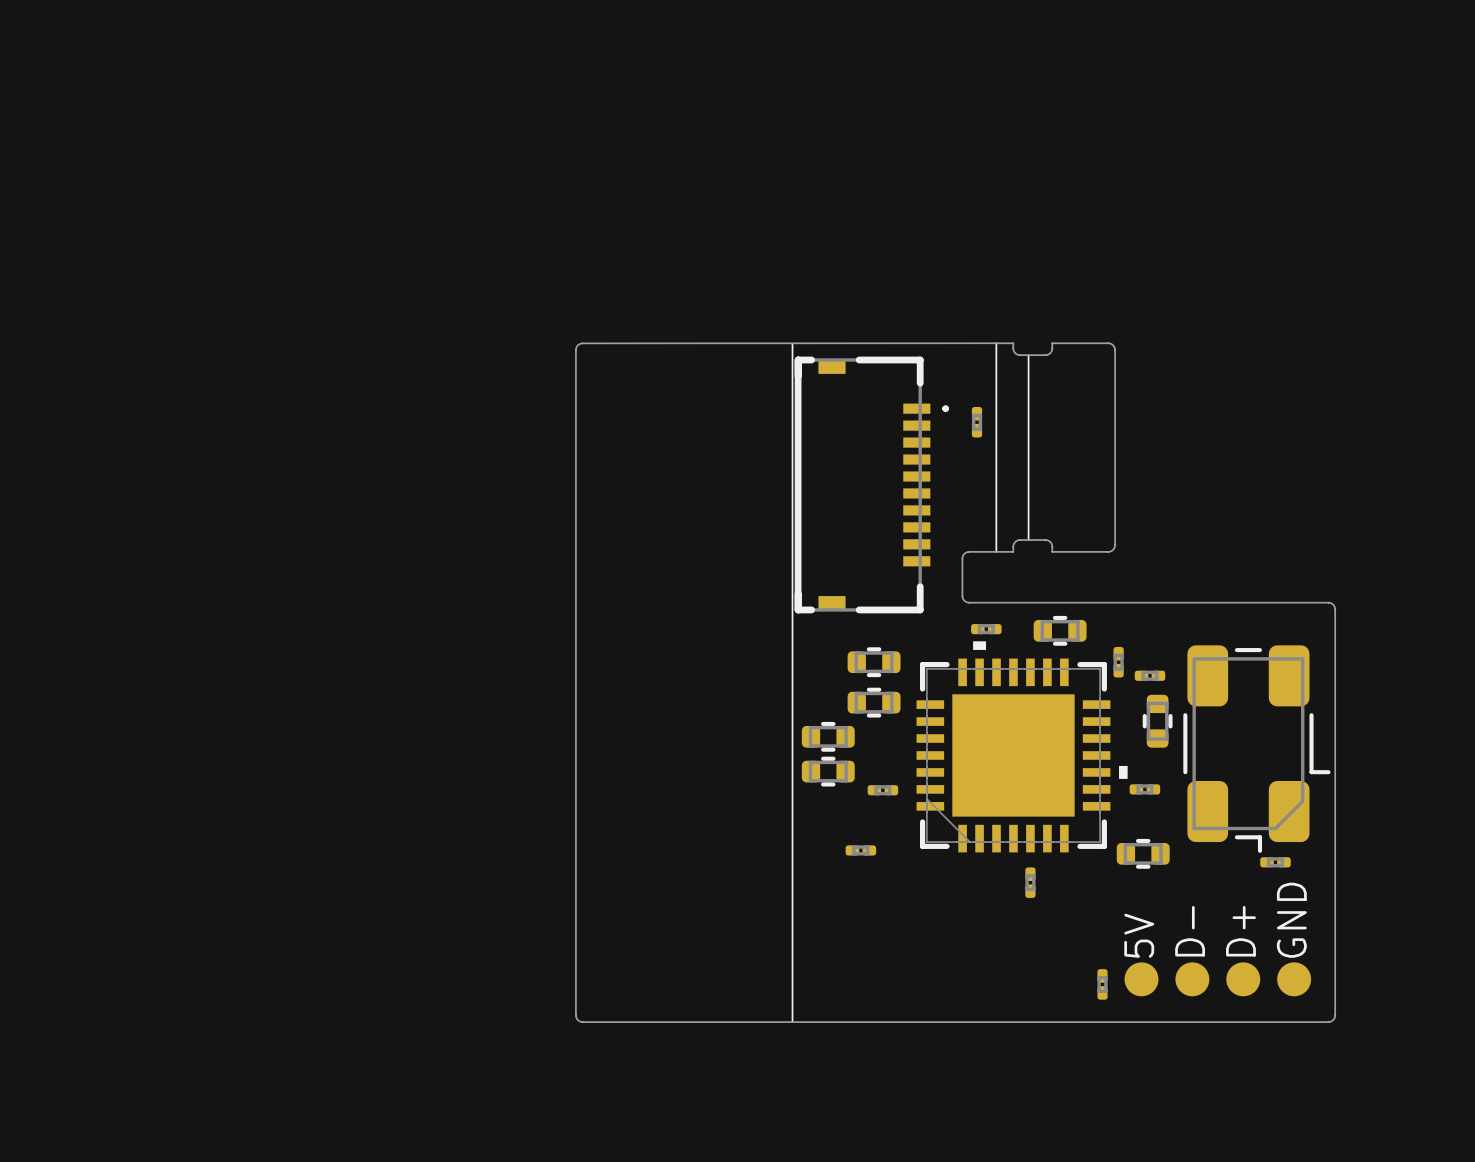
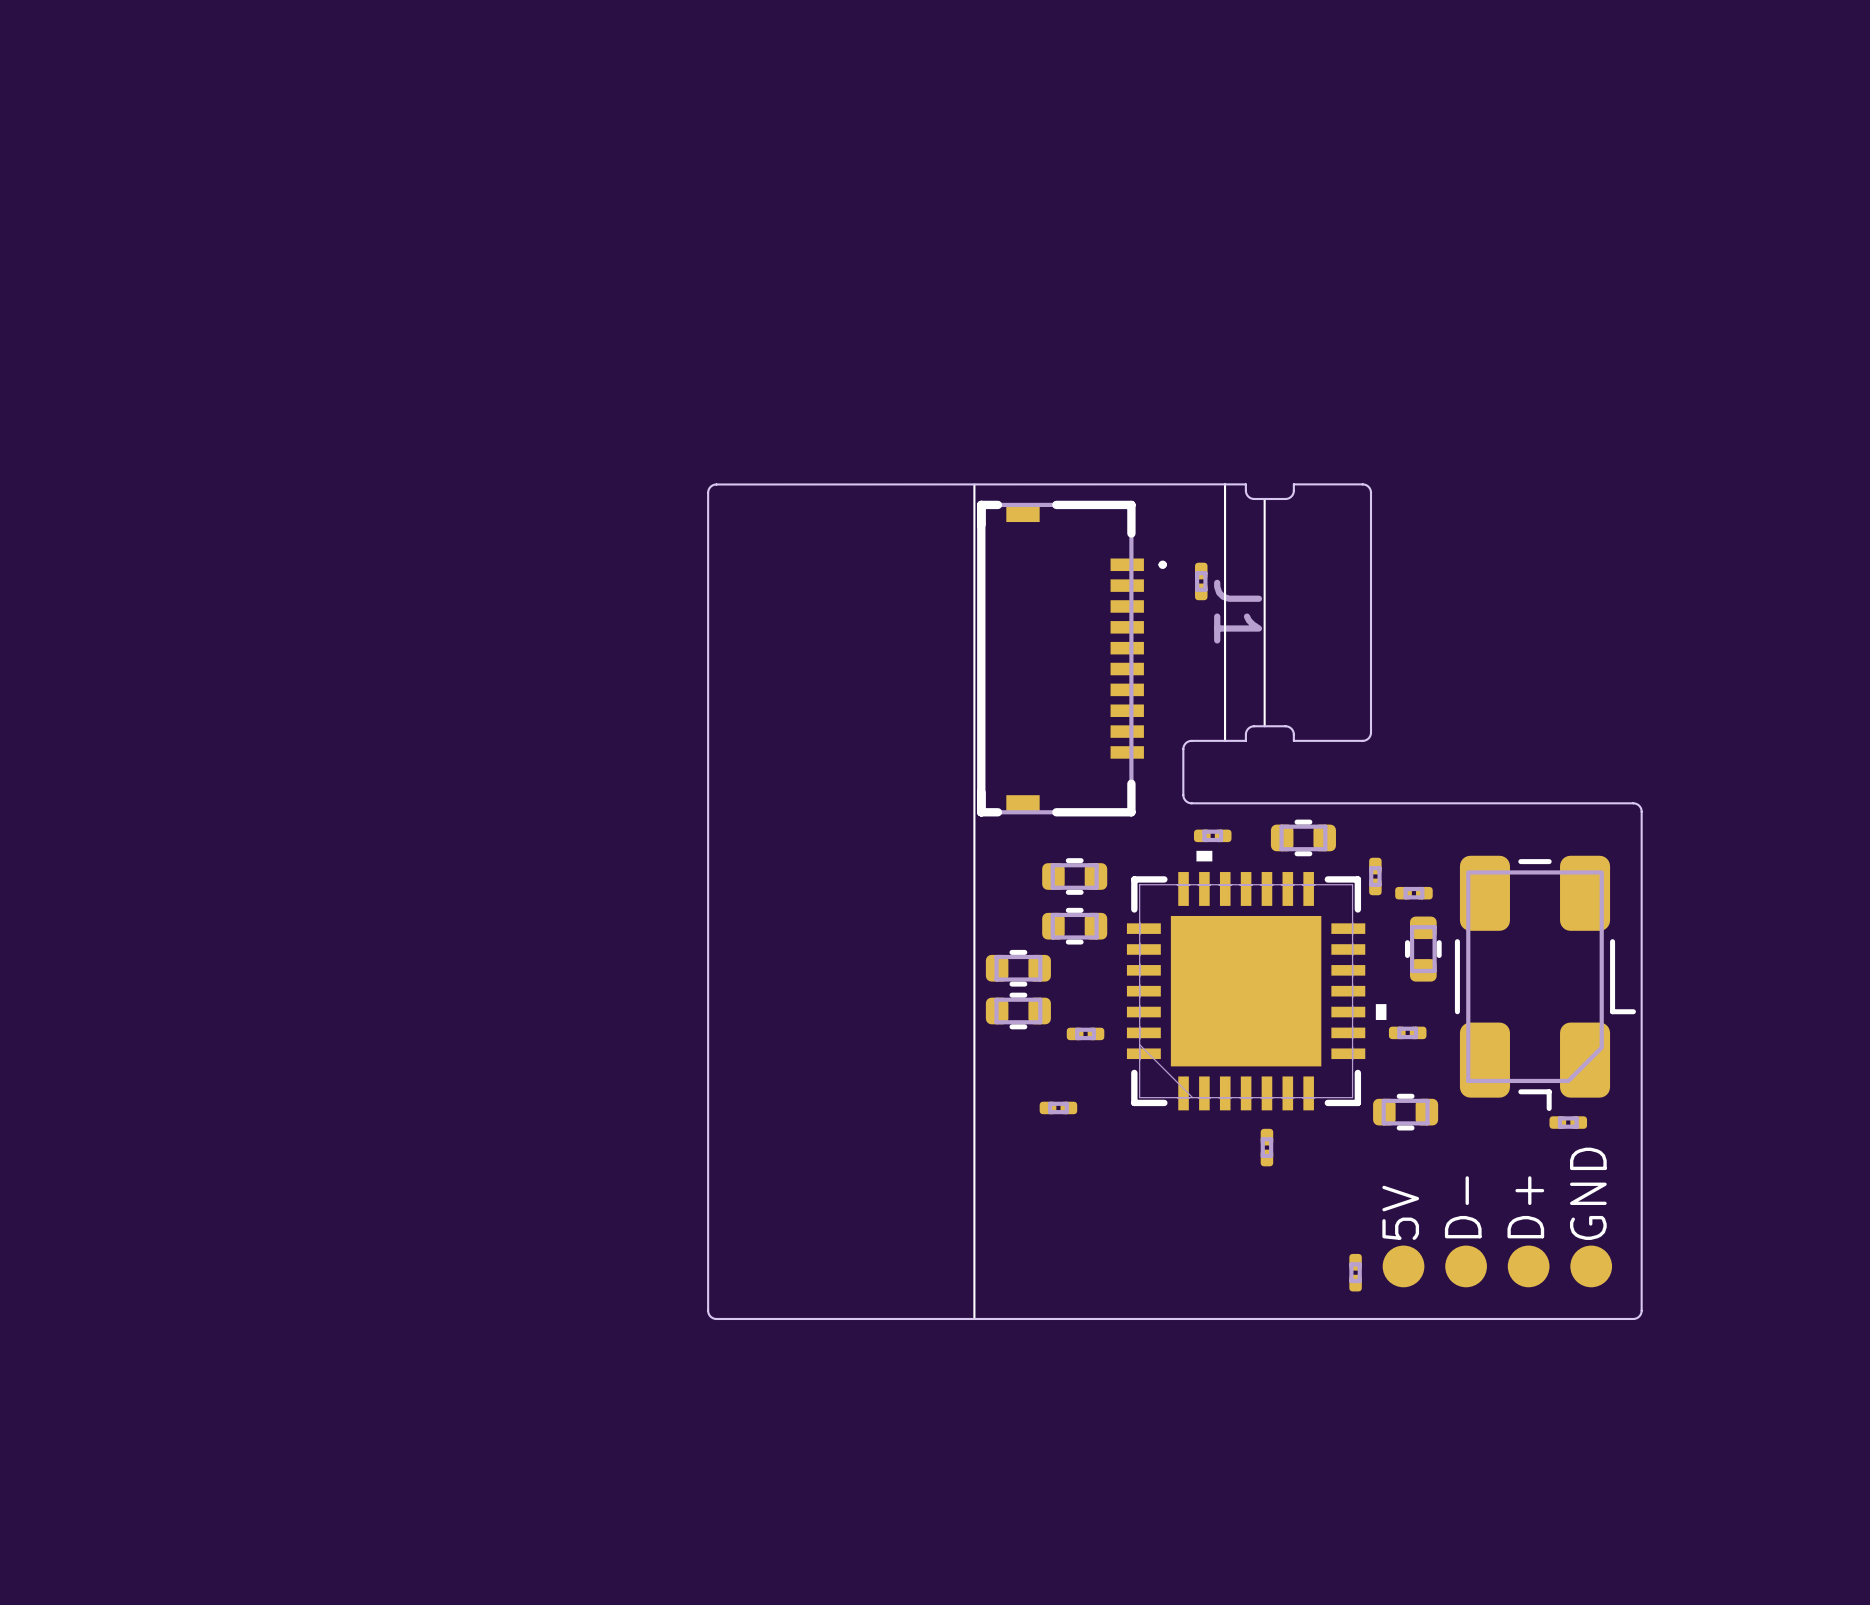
J1 name: none -> J1 (1238, 611)

